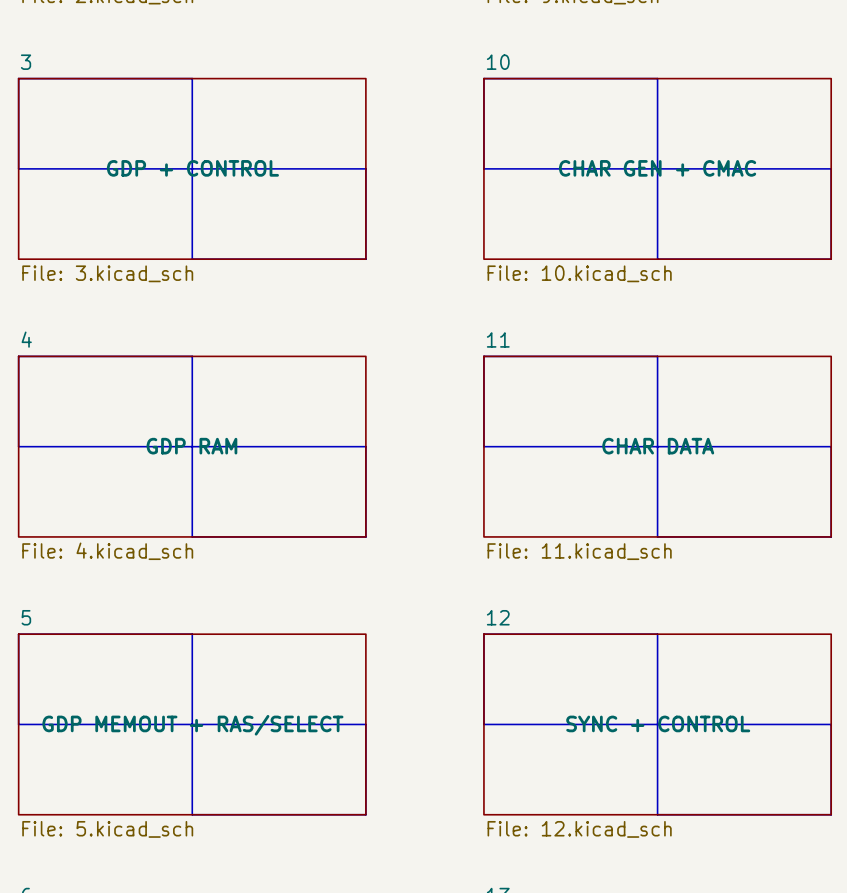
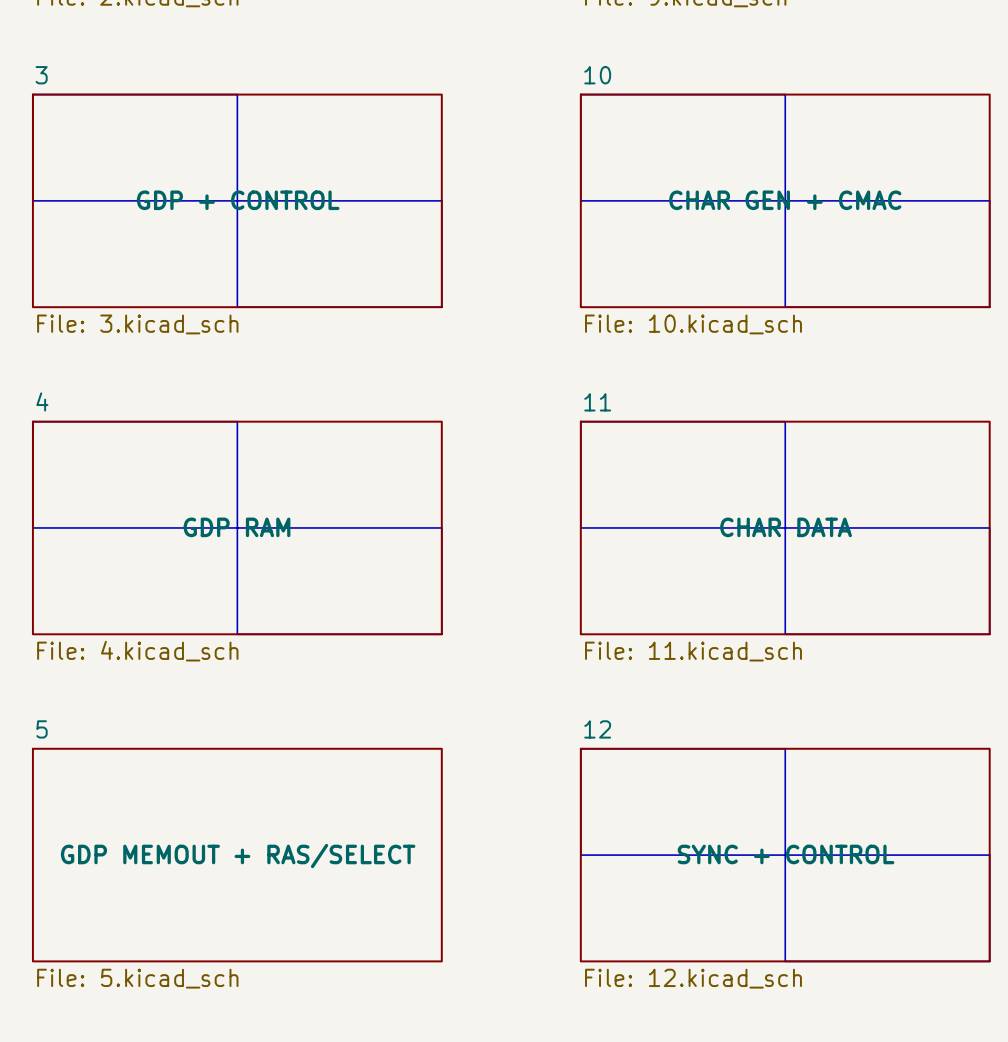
line: (18, 634) (18, 724) (365, 724) (365, 814) (192, 814) (192, 634) (18, 634) -> none

